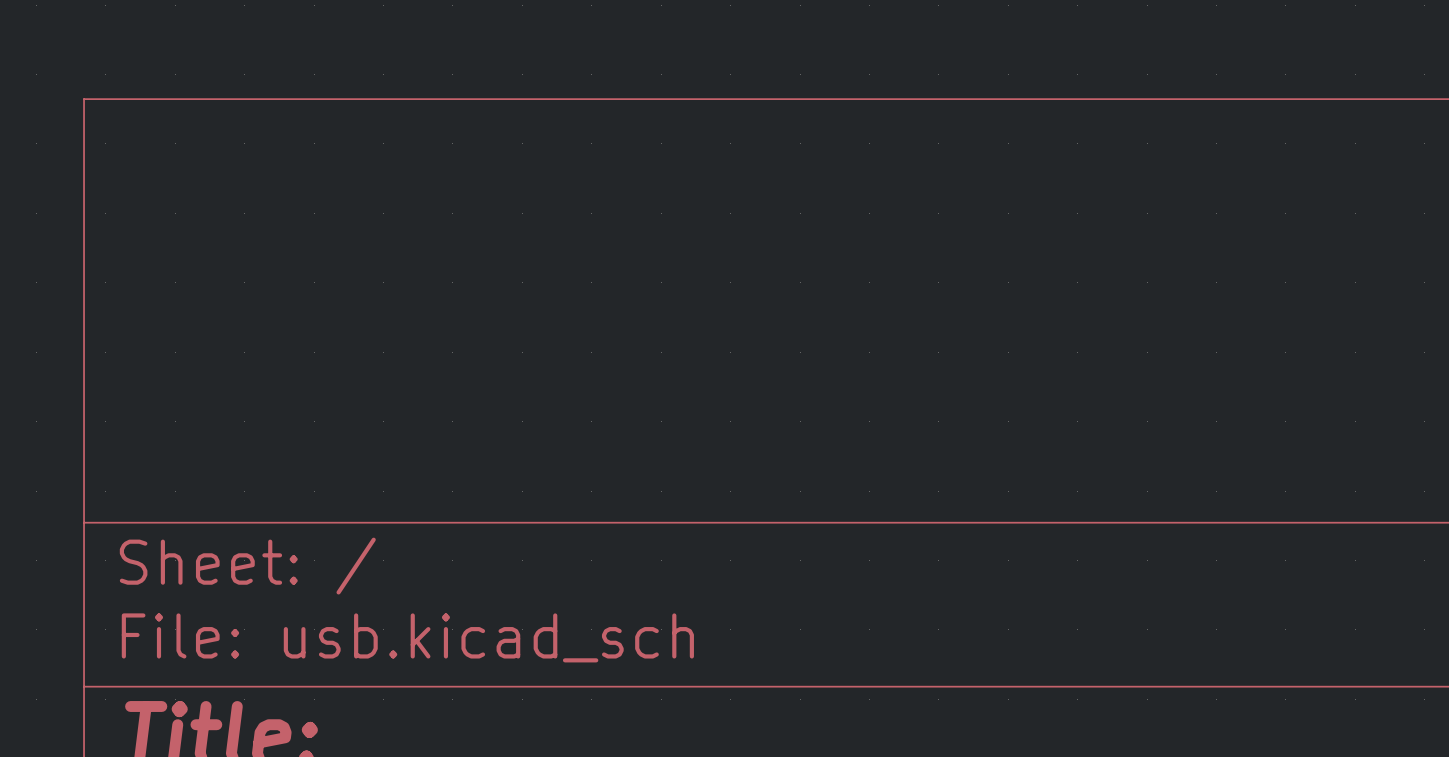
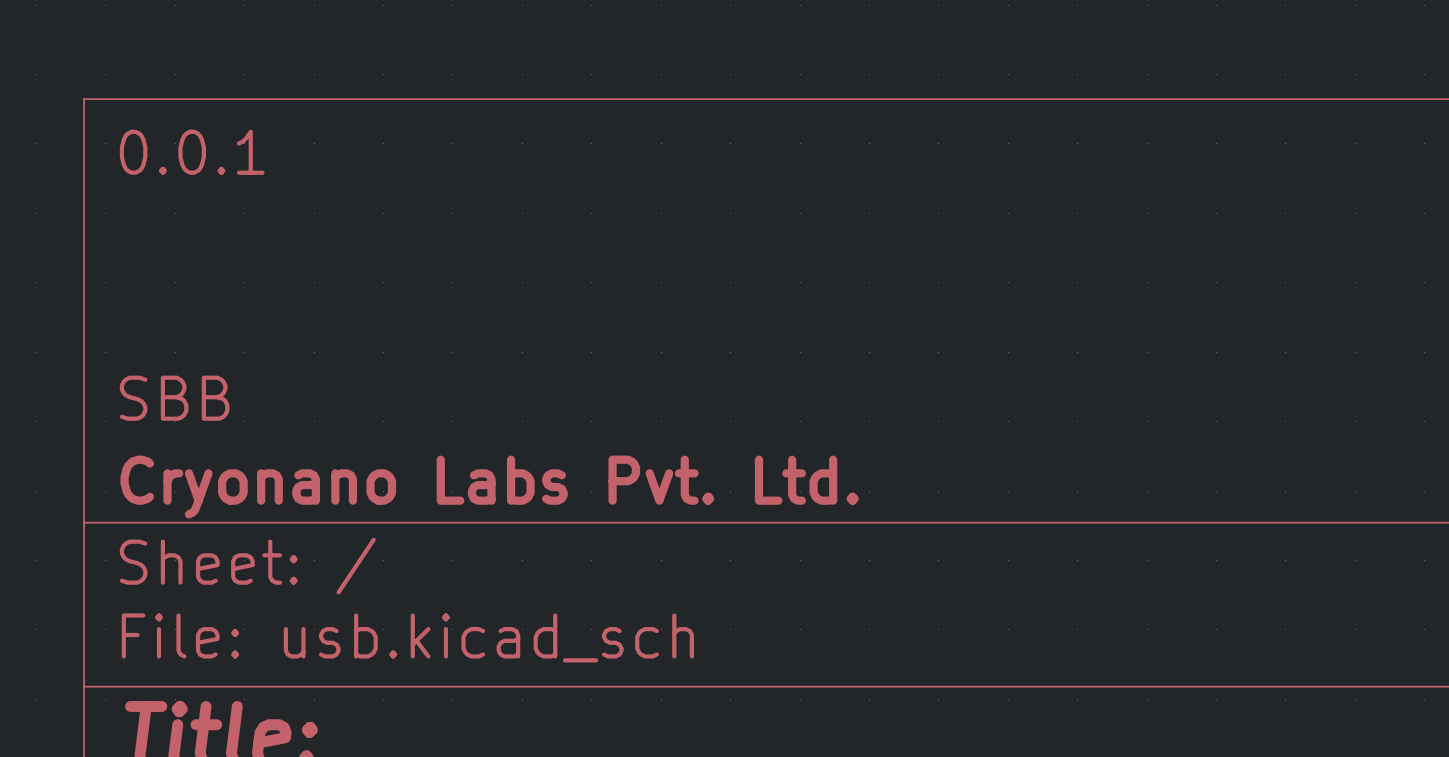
title block: none -> 0.0.1 (192, 152)
title block: none -> SBB (174, 398)
title block: none -> Cryonano Labs Pvt. Ltd. (489, 487)

